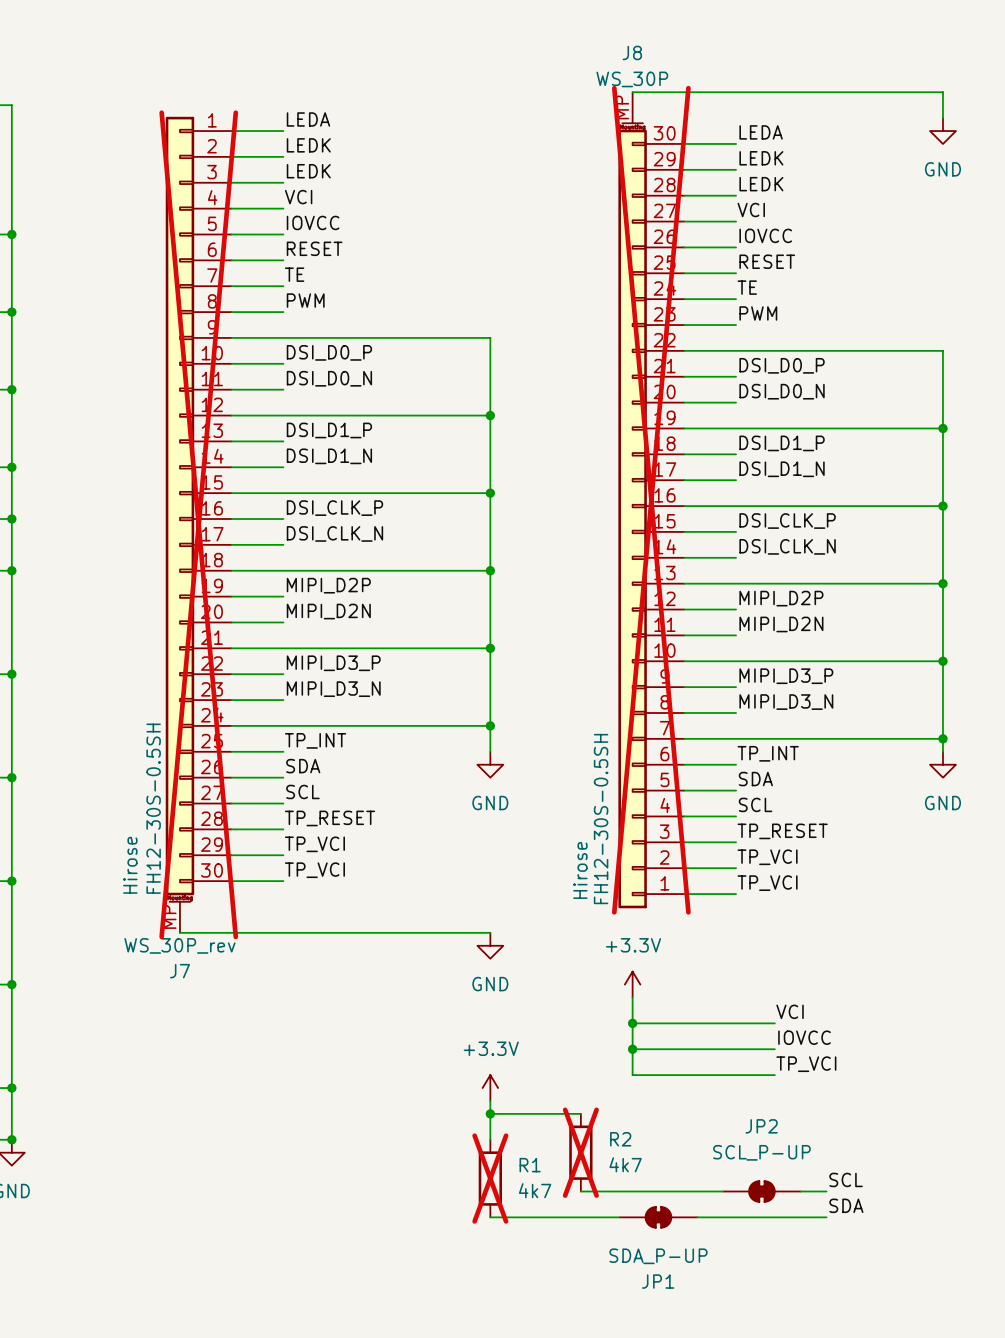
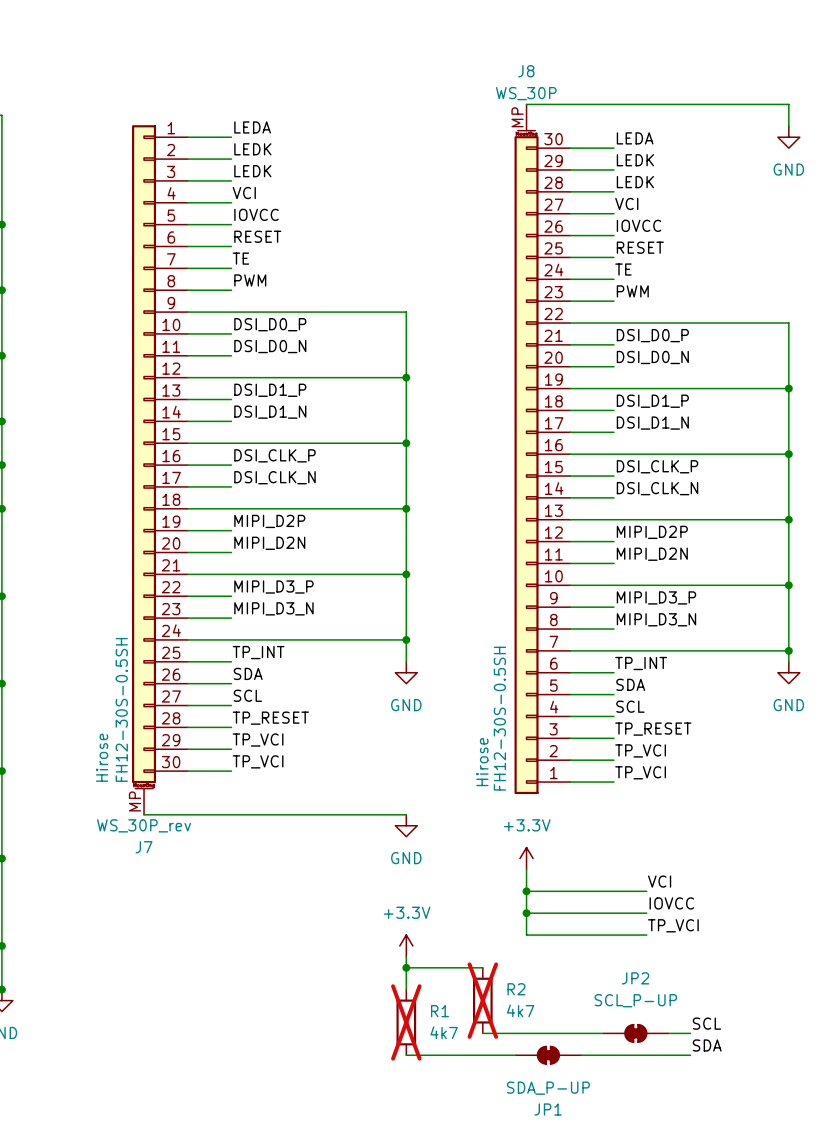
J8 do-not-place cross: (651, 500) -> none
J7 do-not-place cross: (198, 524) -> none

